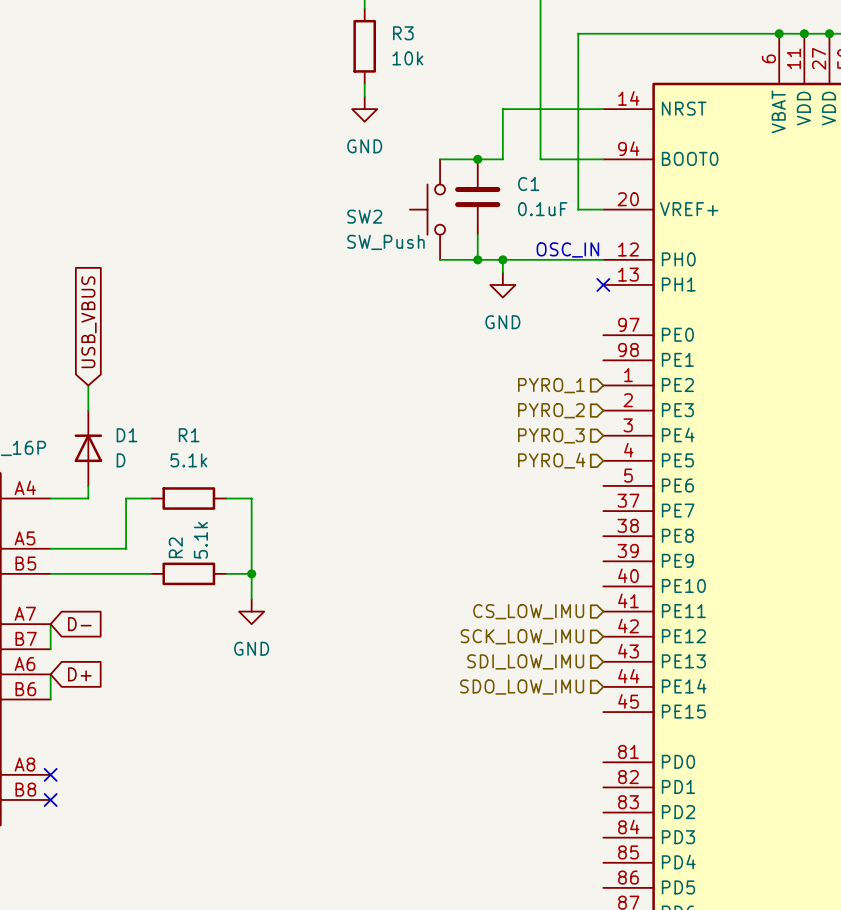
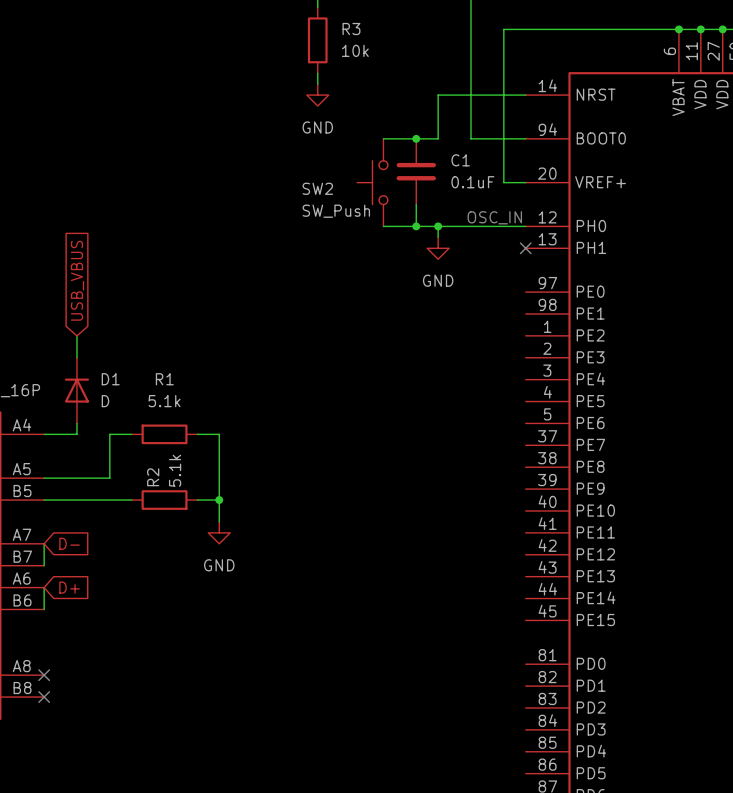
hierarchical label: PYRO_1 (551, 385) -> none
hierarchical label: PYRO_2 (551, 410) -> none
hierarchical label: PYRO_3 (551, 435) -> none
hierarchical label: PYRO_4 (551, 460) -> none
hierarchical label: CS_LOW_IMU (528, 611) -> none
hierarchical label: SCK_LOW_IMU (522, 636) -> none
hierarchical label: SDI_LOW_IMU (525, 661) -> none
hierarchical label: SDO_LOW_IMU (522, 687) -> none

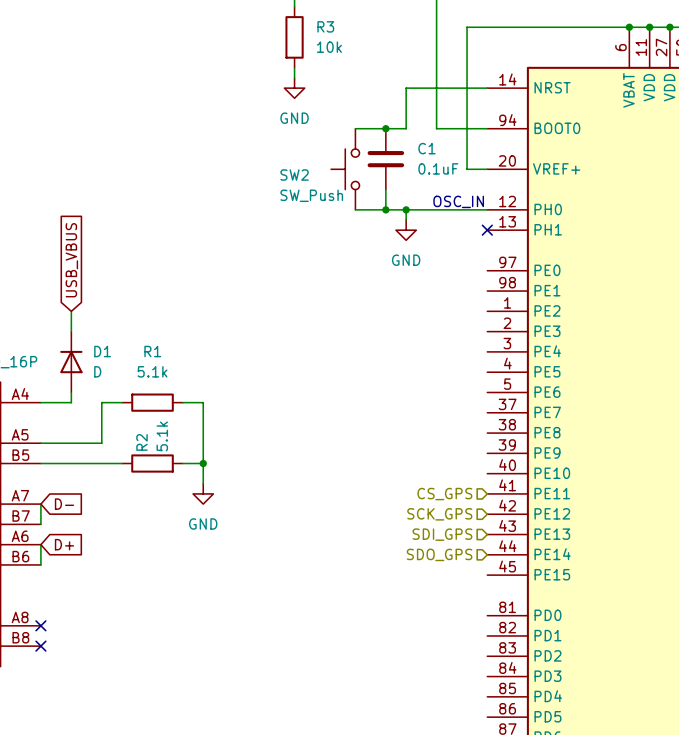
hierarchical label: none -> CS_GPS (444, 494)
hierarchical label: none -> SCK_GPS (439, 514)
hierarchical label: none -> SDI_GPS (442, 534)
hierarchical label: none -> SDO_GPS (439, 554)

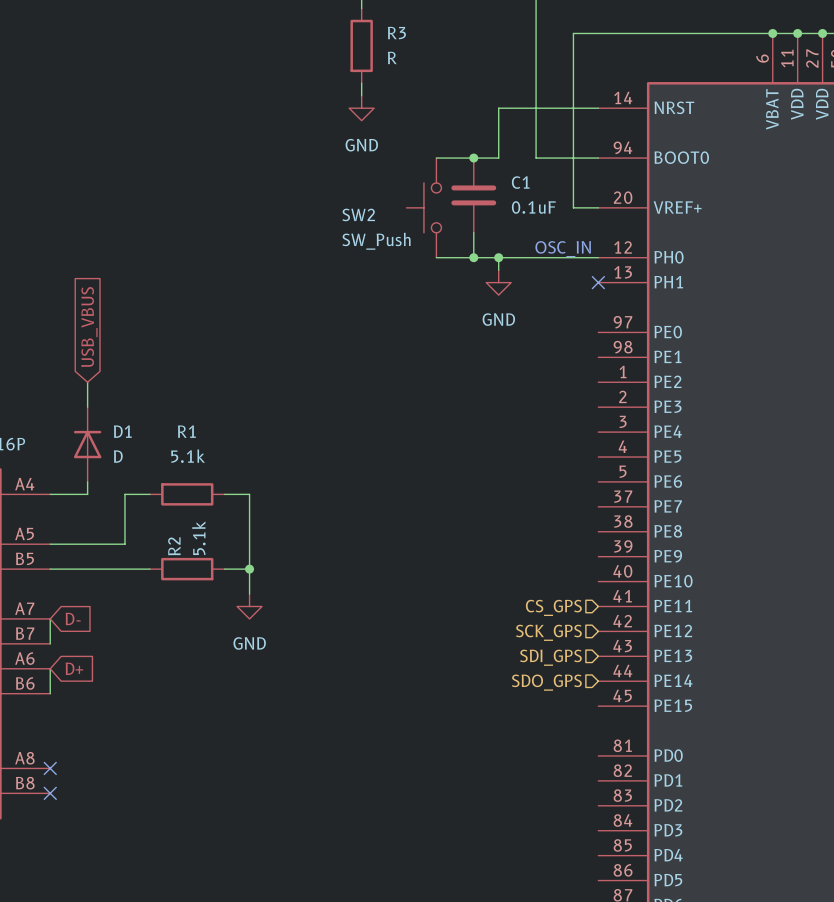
R3 value: 10k (329, 47) -> R (392, 57)

